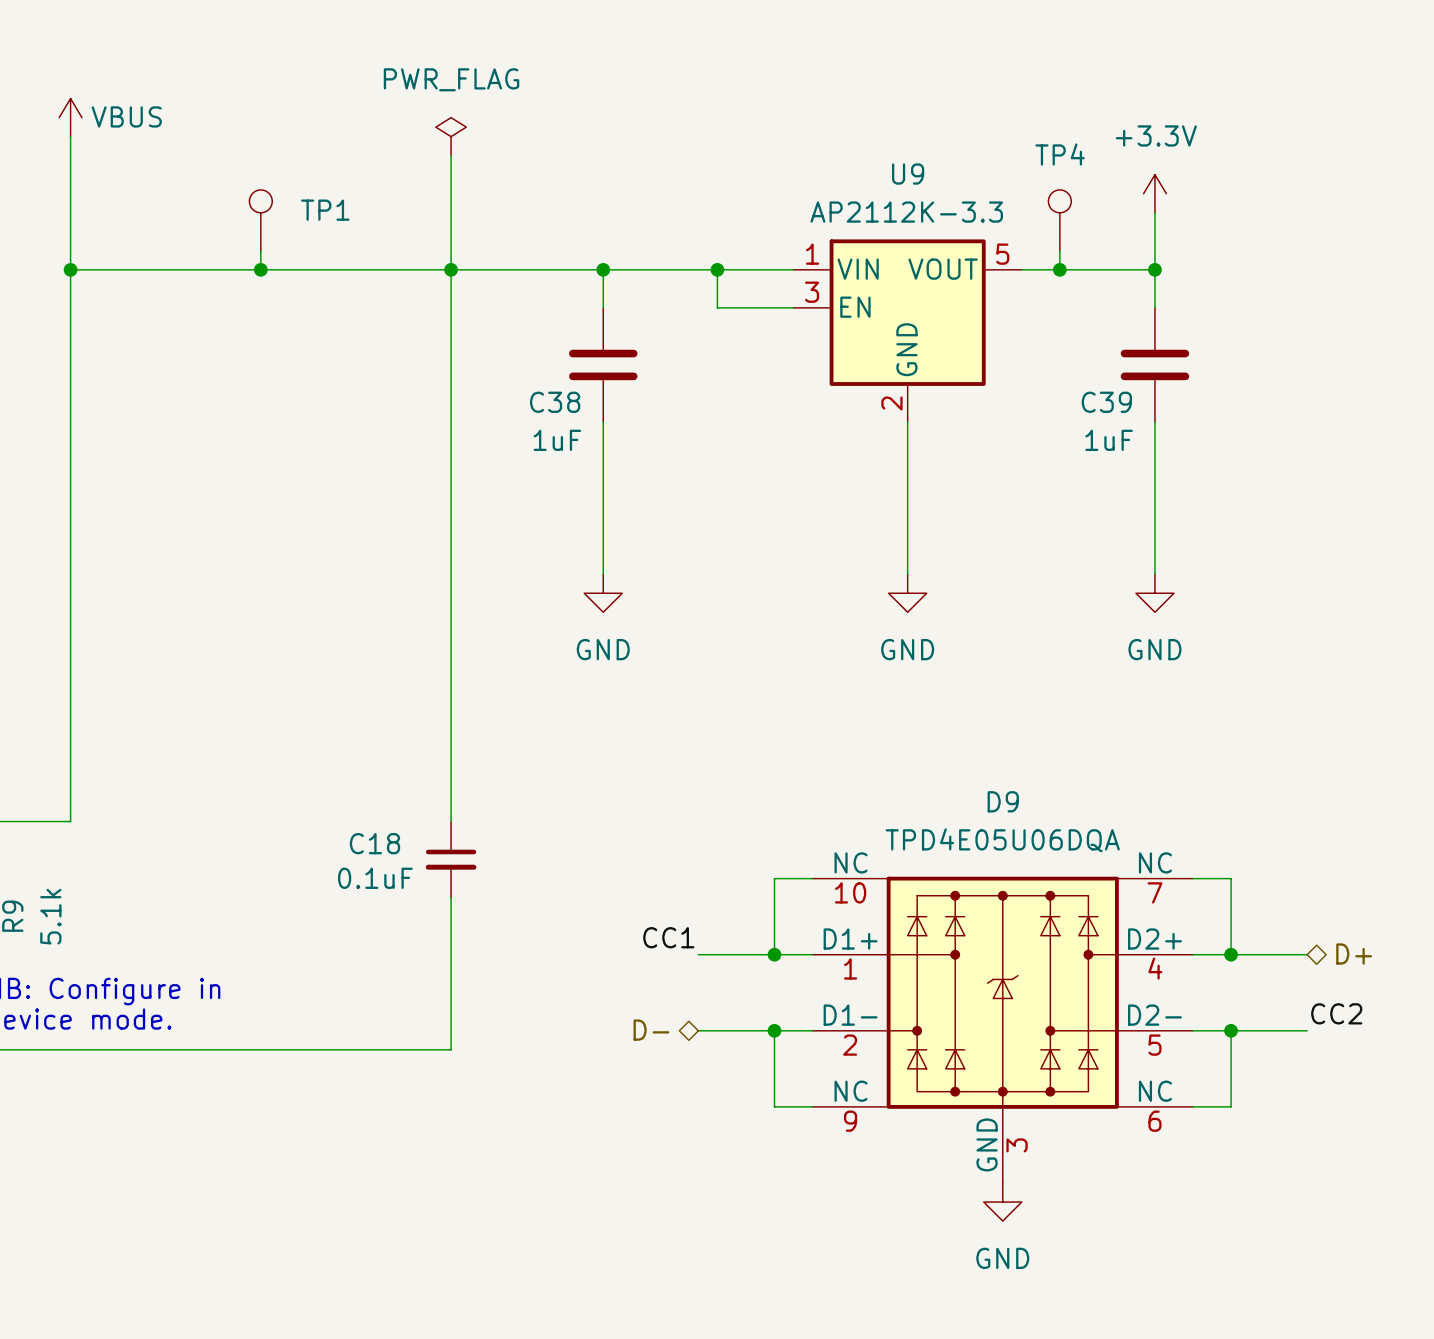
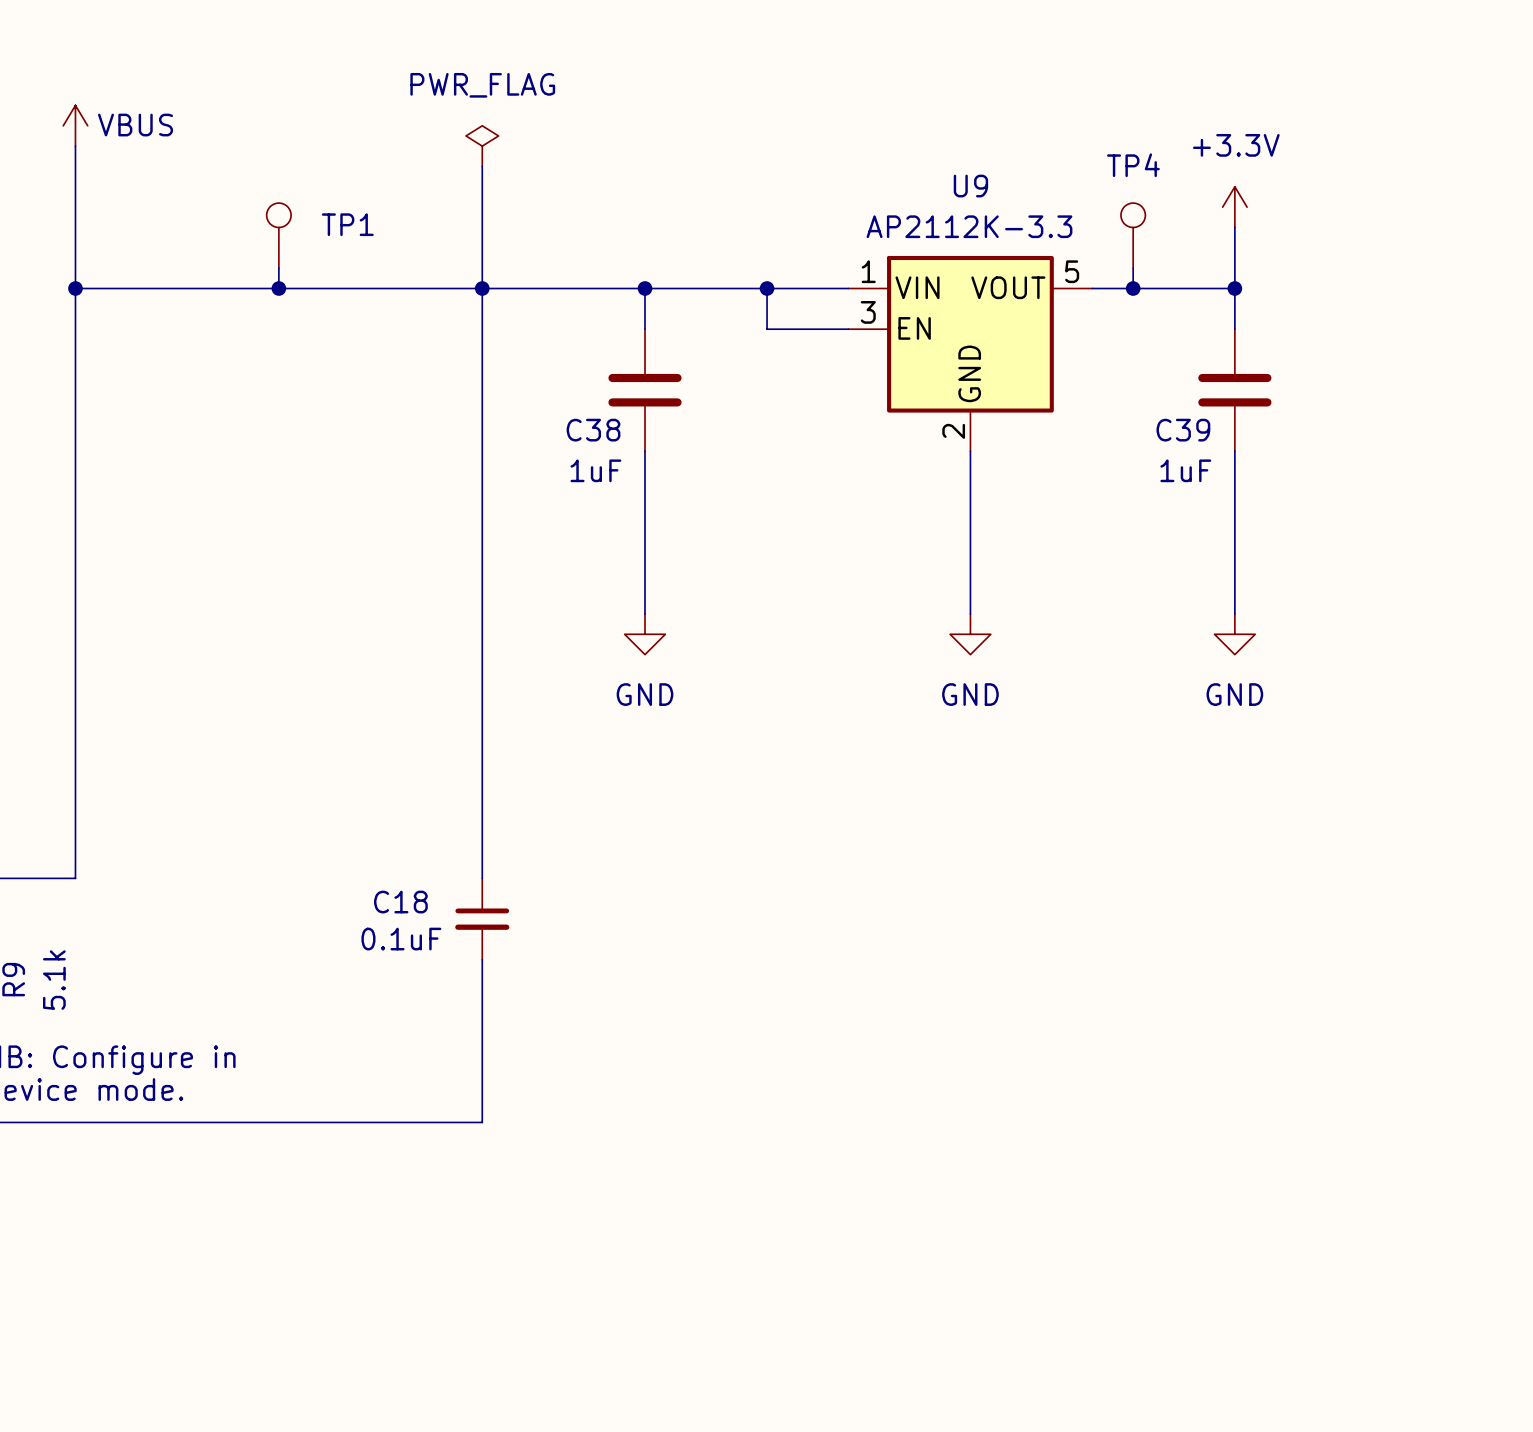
wire: (812, 878) (774, 878) (774, 954) -> none
wire: (1193, 878) (1231, 878) (1231, 954) -> none
label: CC1 (668, 937) -> none
wire: (698, 954) (812, 954) -> none
junction: (774, 954) -> none
wire: (1193, 954) (1307, 954) -> none
junction: (1231, 954) -> none
hierarchical label: D+ (1354, 954) -> none
label: CC2 (1336, 1013) -> none
D9: TPD4E05U06DQA (1002, 1029) -> none
hierarchical label: D- (651, 1030) -> none
wire: (698, 1030) (812, 1030) -> none
wire: (774, 1030) (774, 1106) (812, 1106) -> none
junction: (774, 1030) -> none
wire: (1193, 1030) (1307, 1030) -> none
wire: (1231, 1030) (1231, 1106) (1193, 1106) -> none
junction: (1231, 1030) -> none
power symbol: GND (1002, 1202) -> none

